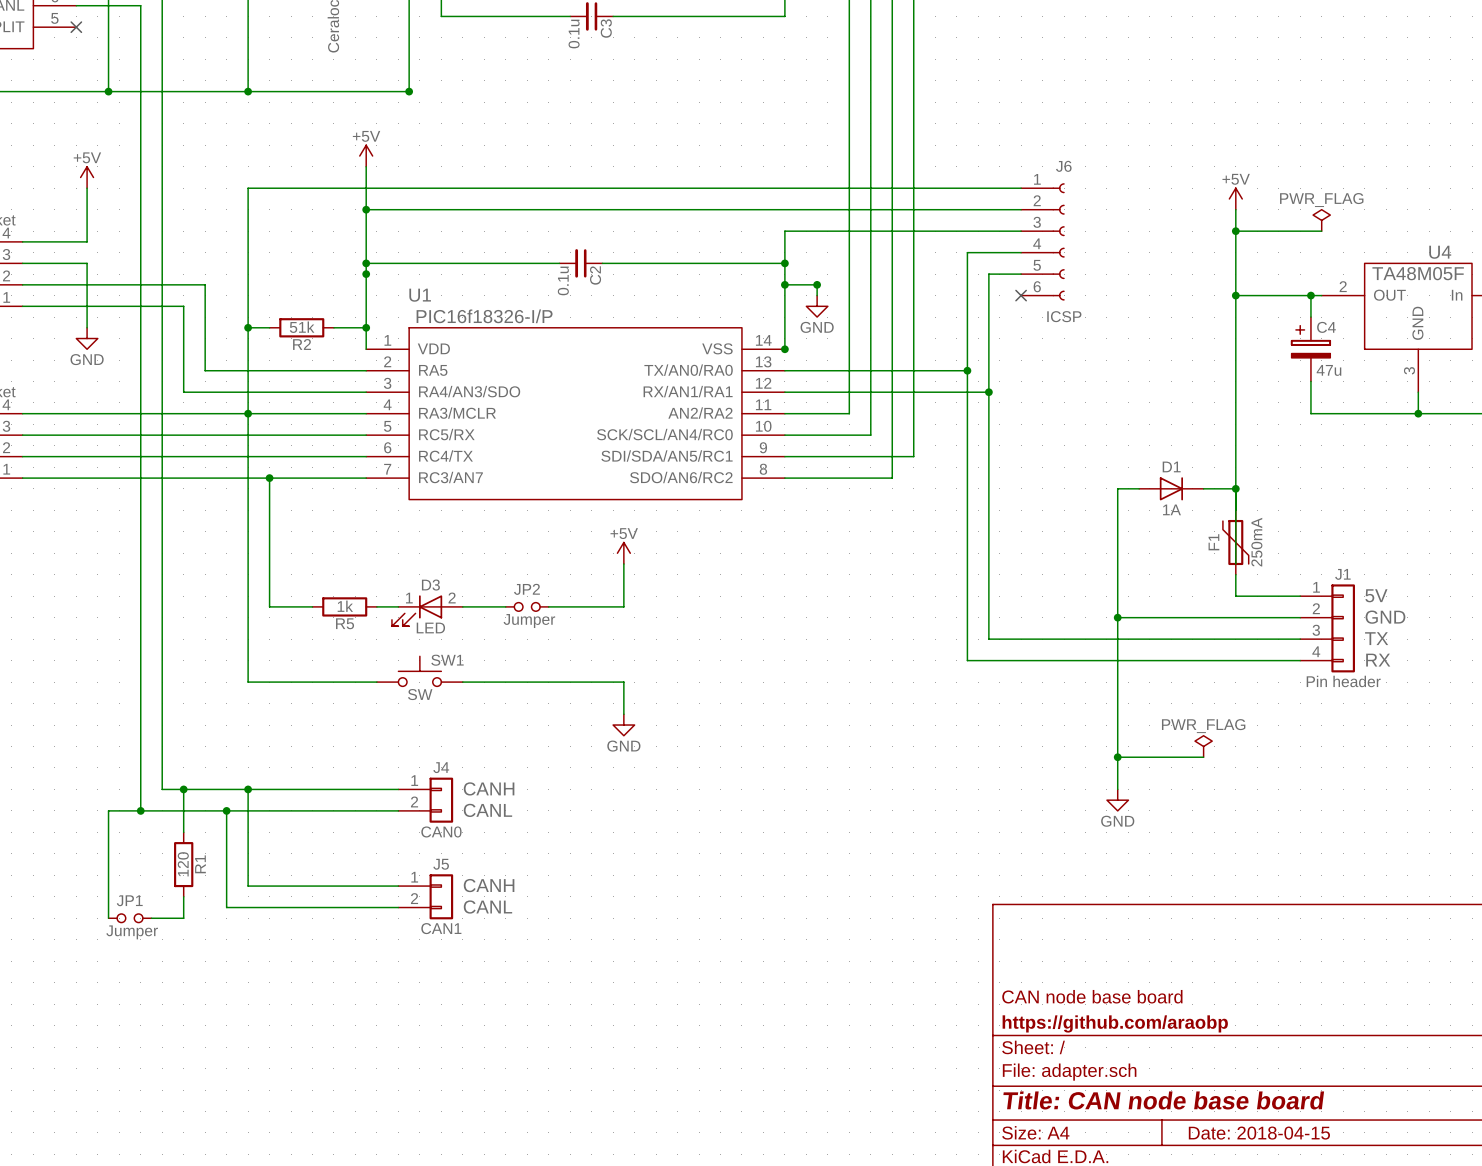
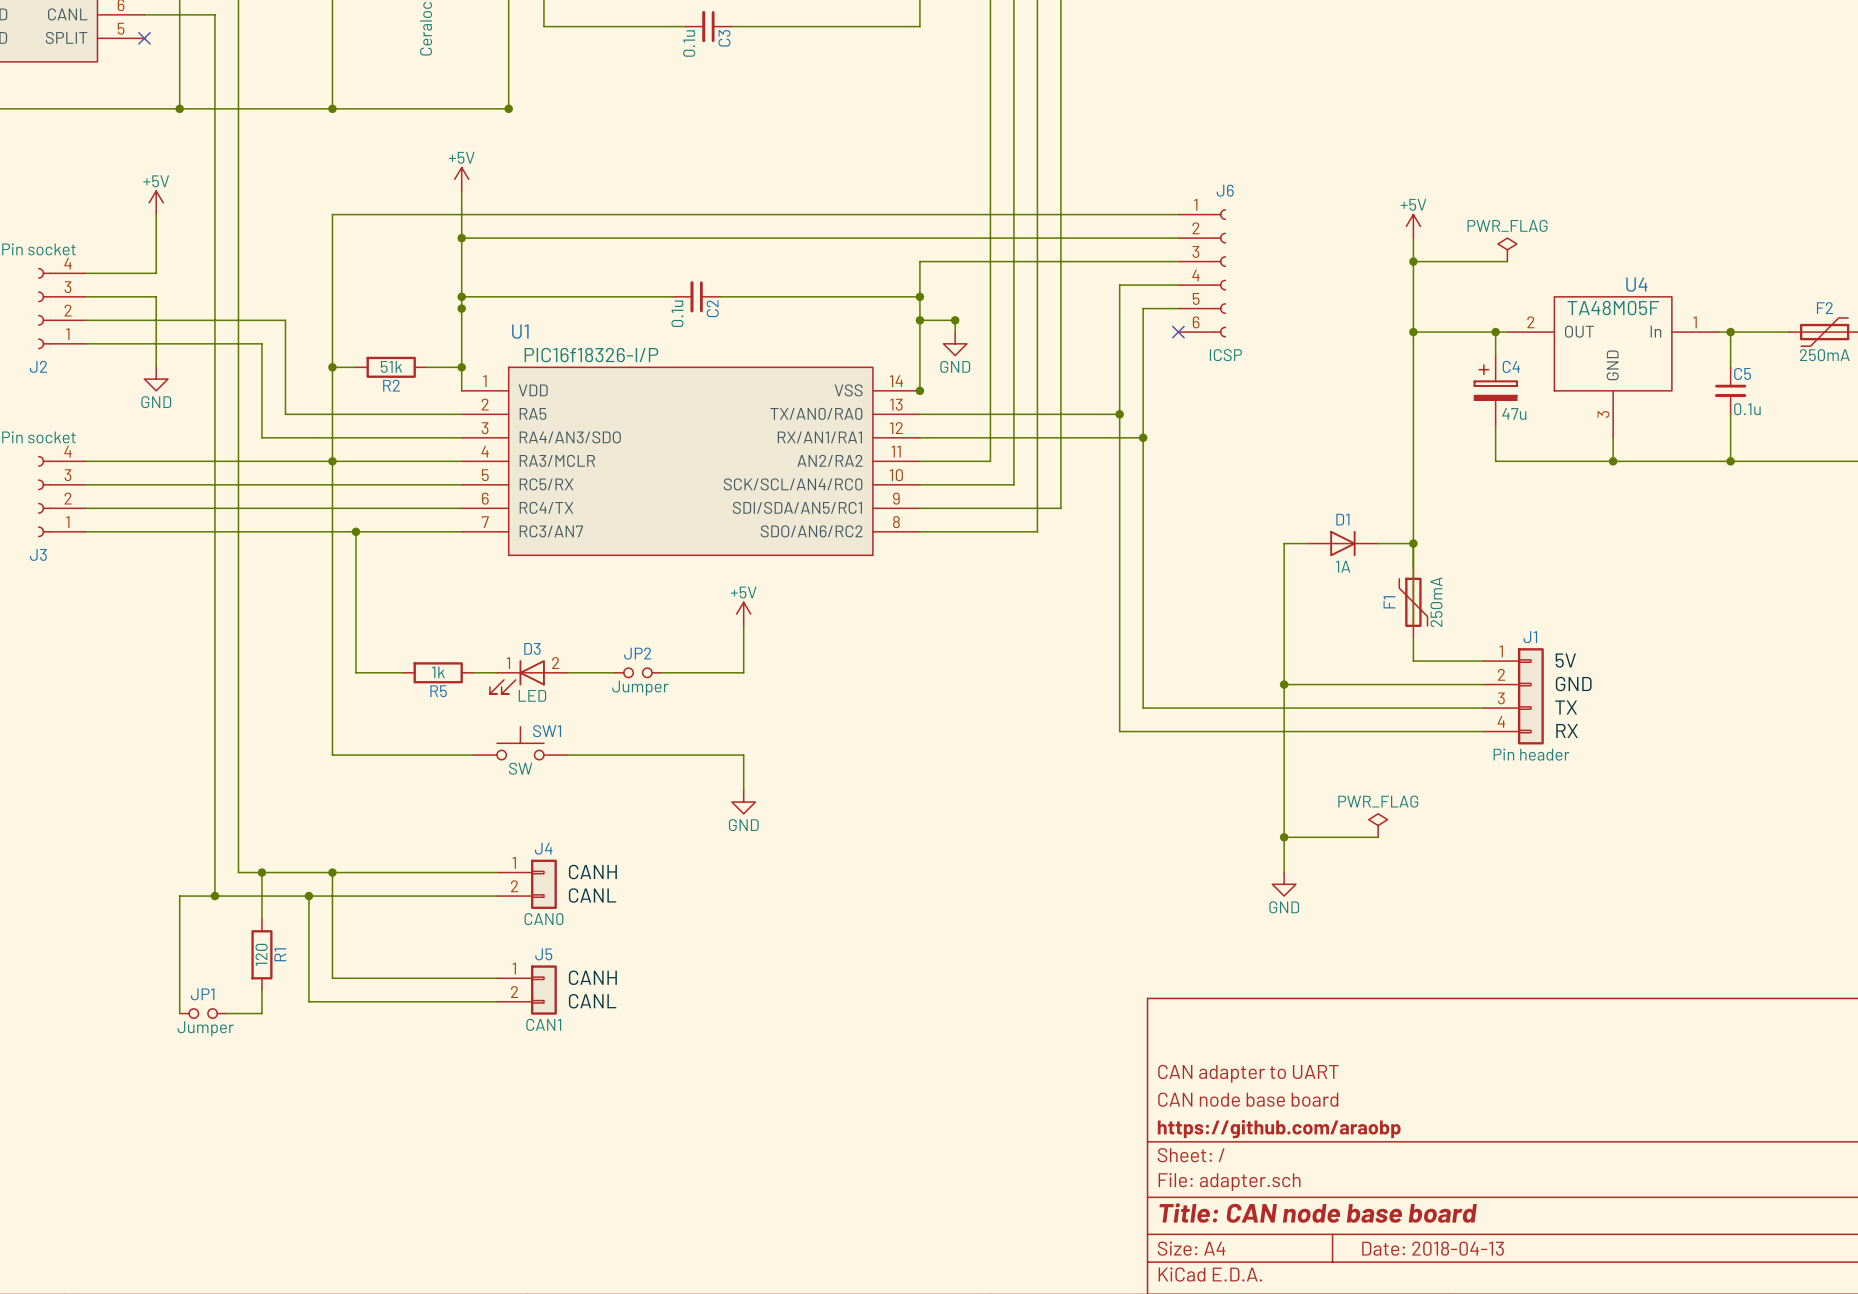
title block: none -> CAN adapter to UART (1248, 1073)
title block: Date: 2018-04-15 (1259, 1133) -> Date: 2018-04-13 (1433, 1248)

